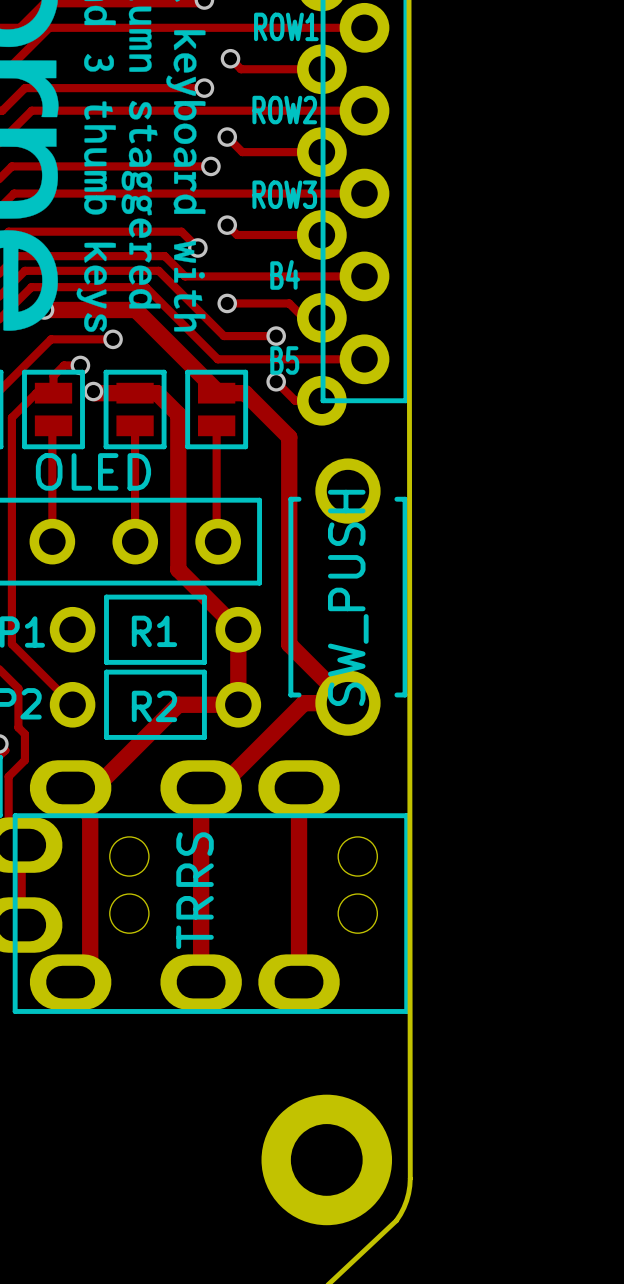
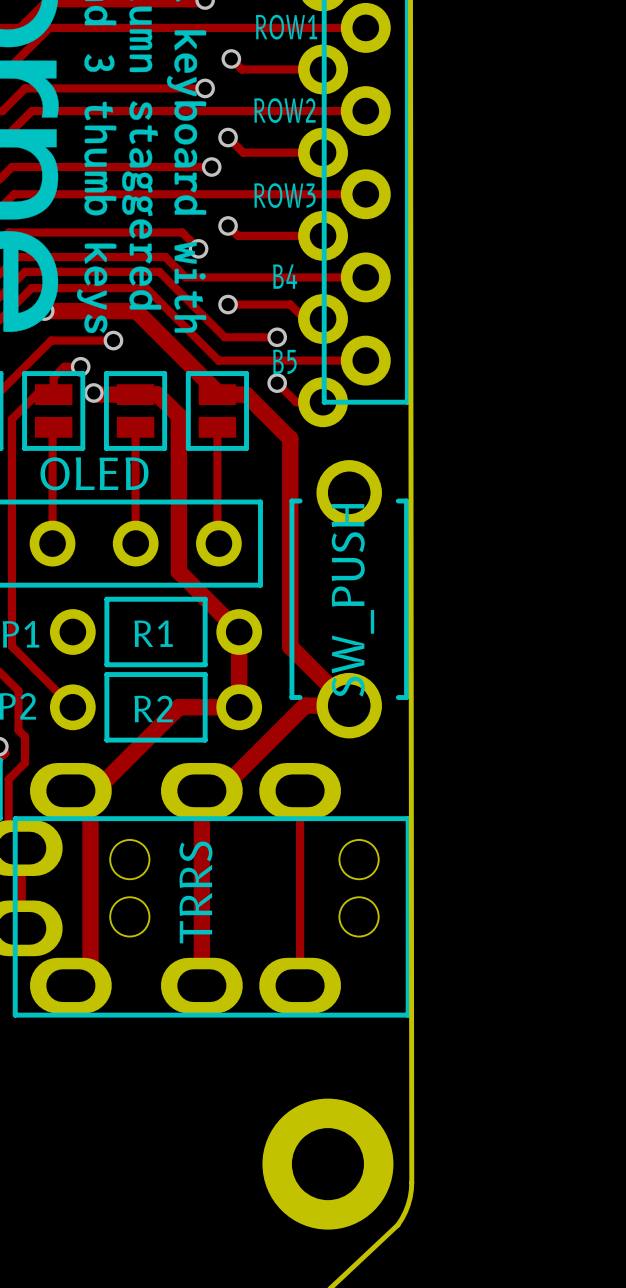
track width: thick (299, 787) (299, 982) -> thin (300, 790) (300, 985)

